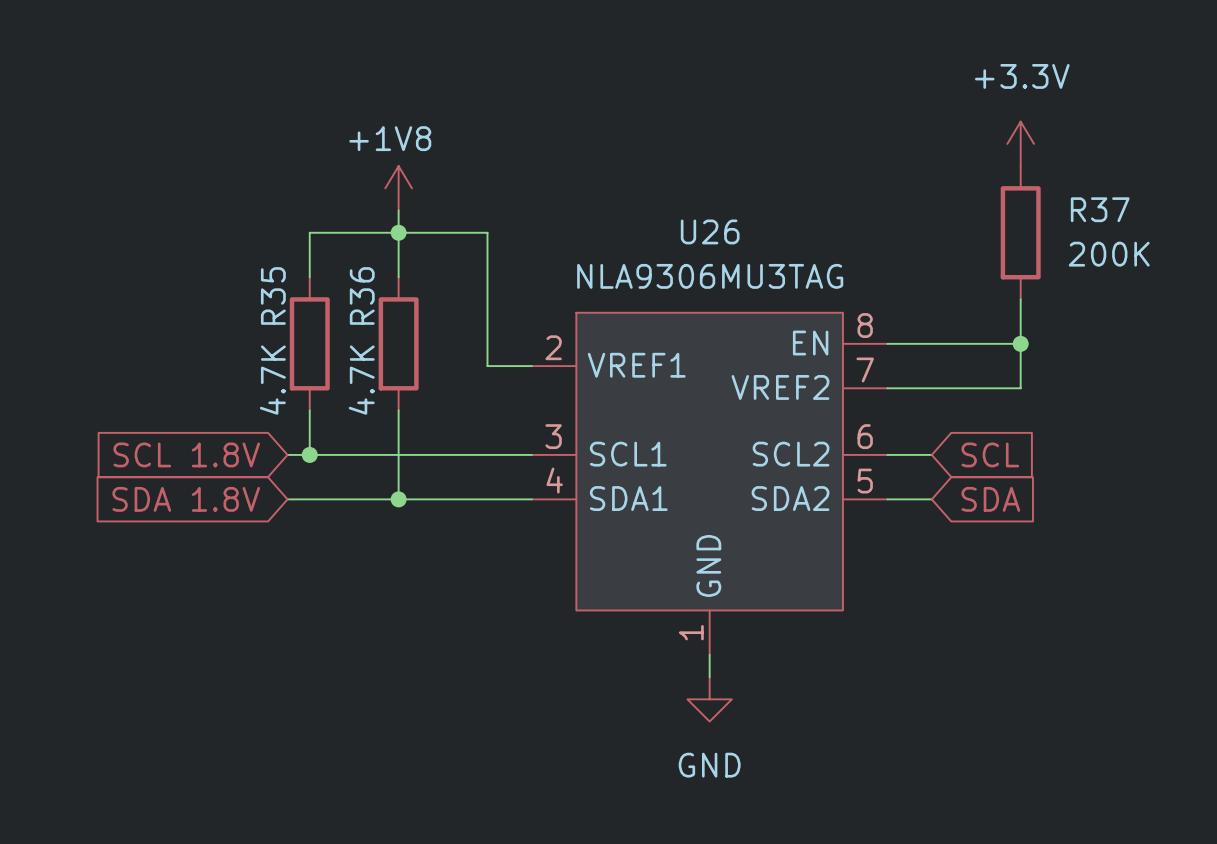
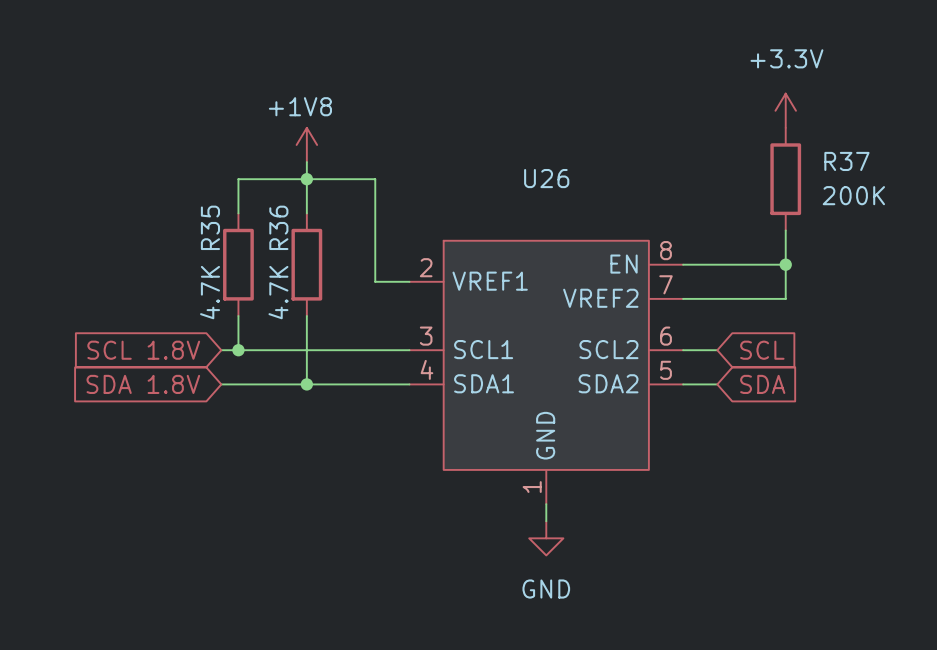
U26 value: NLA9306MU3TAG (710, 276) -> none

